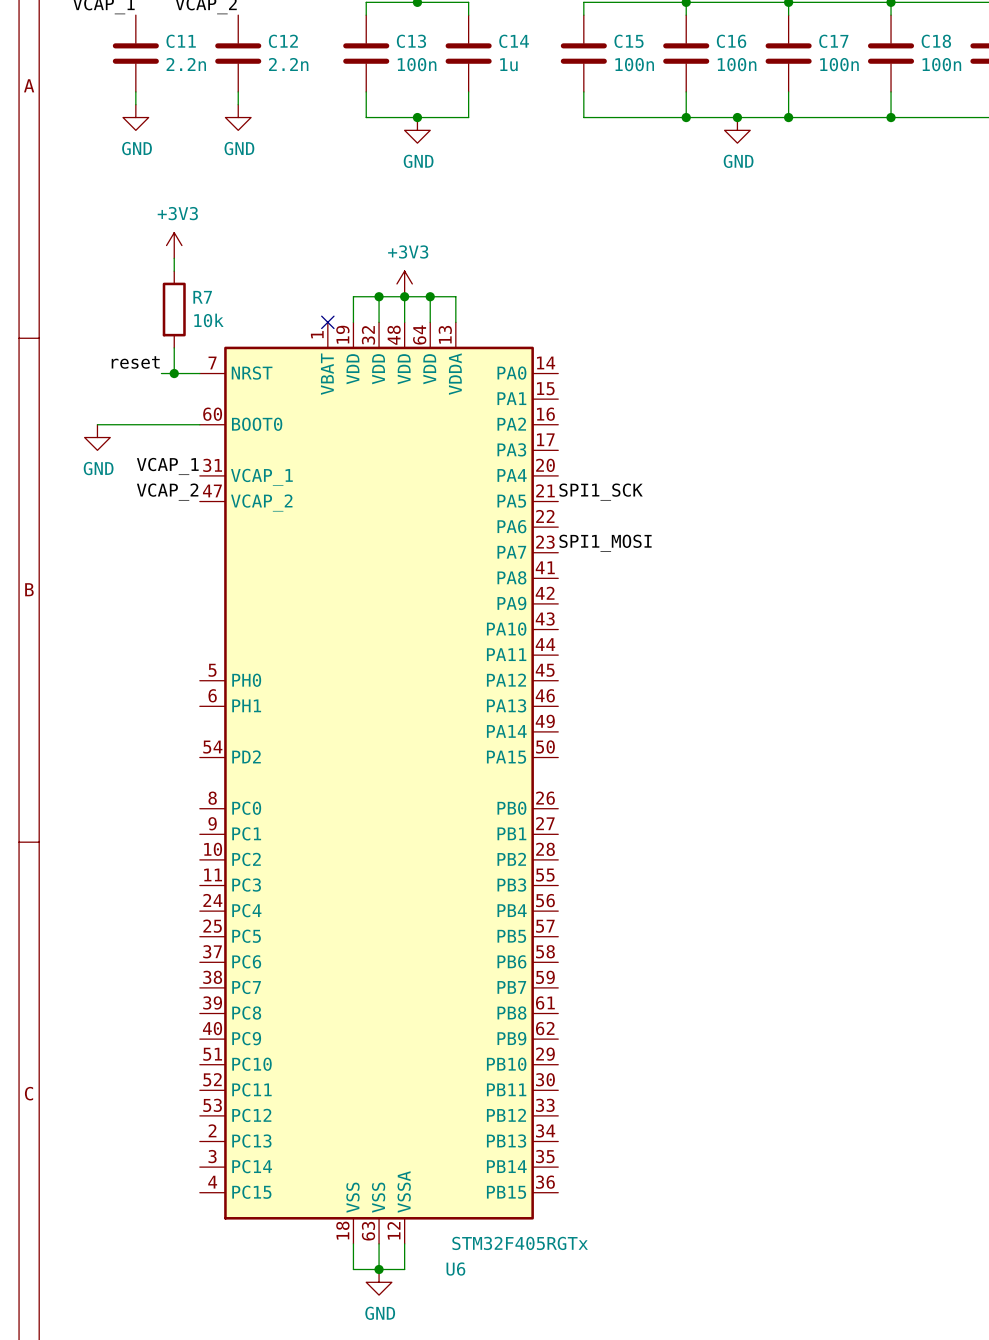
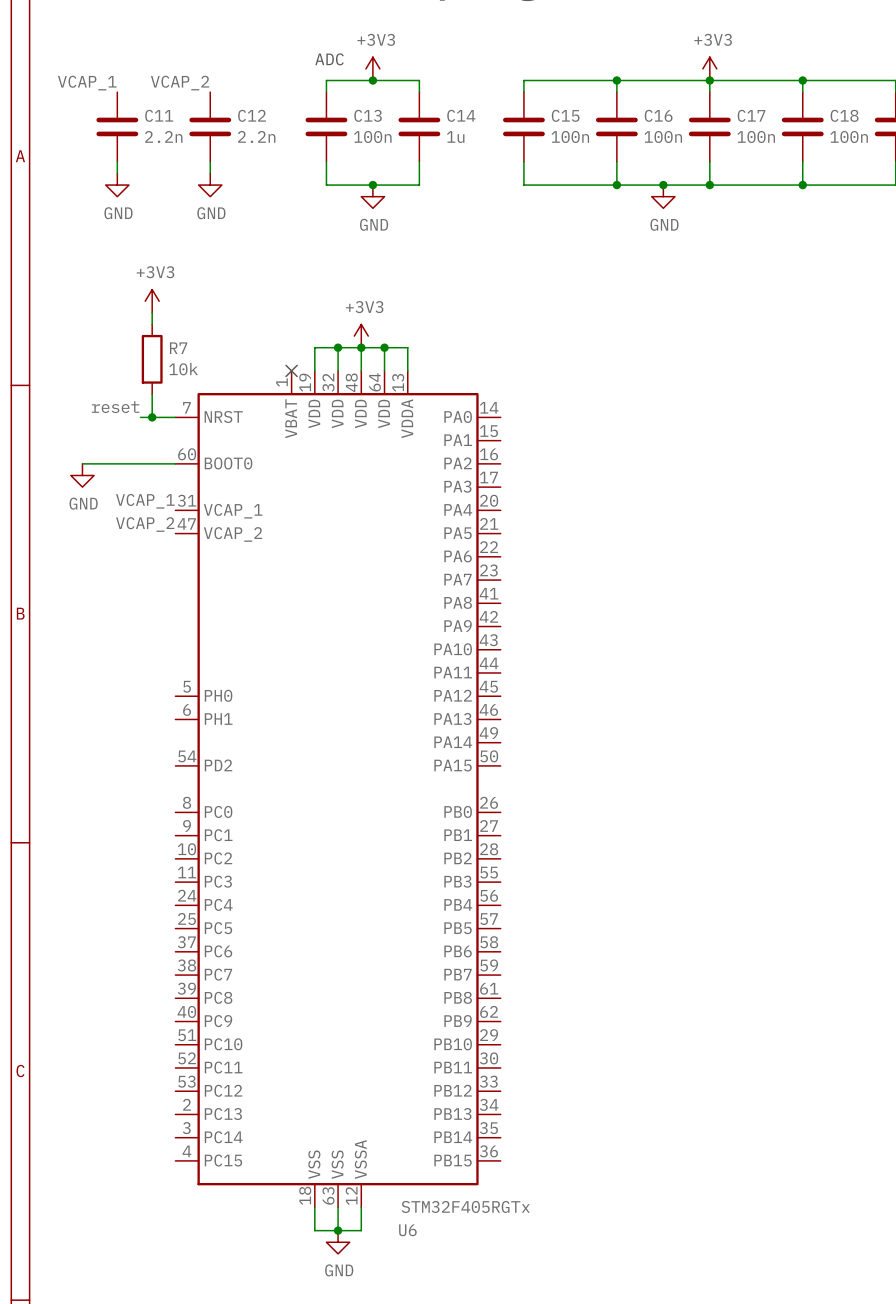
label: SPI1_SCK (601, 492) -> none
label: SPI1_MOSI (605, 543) -> none

